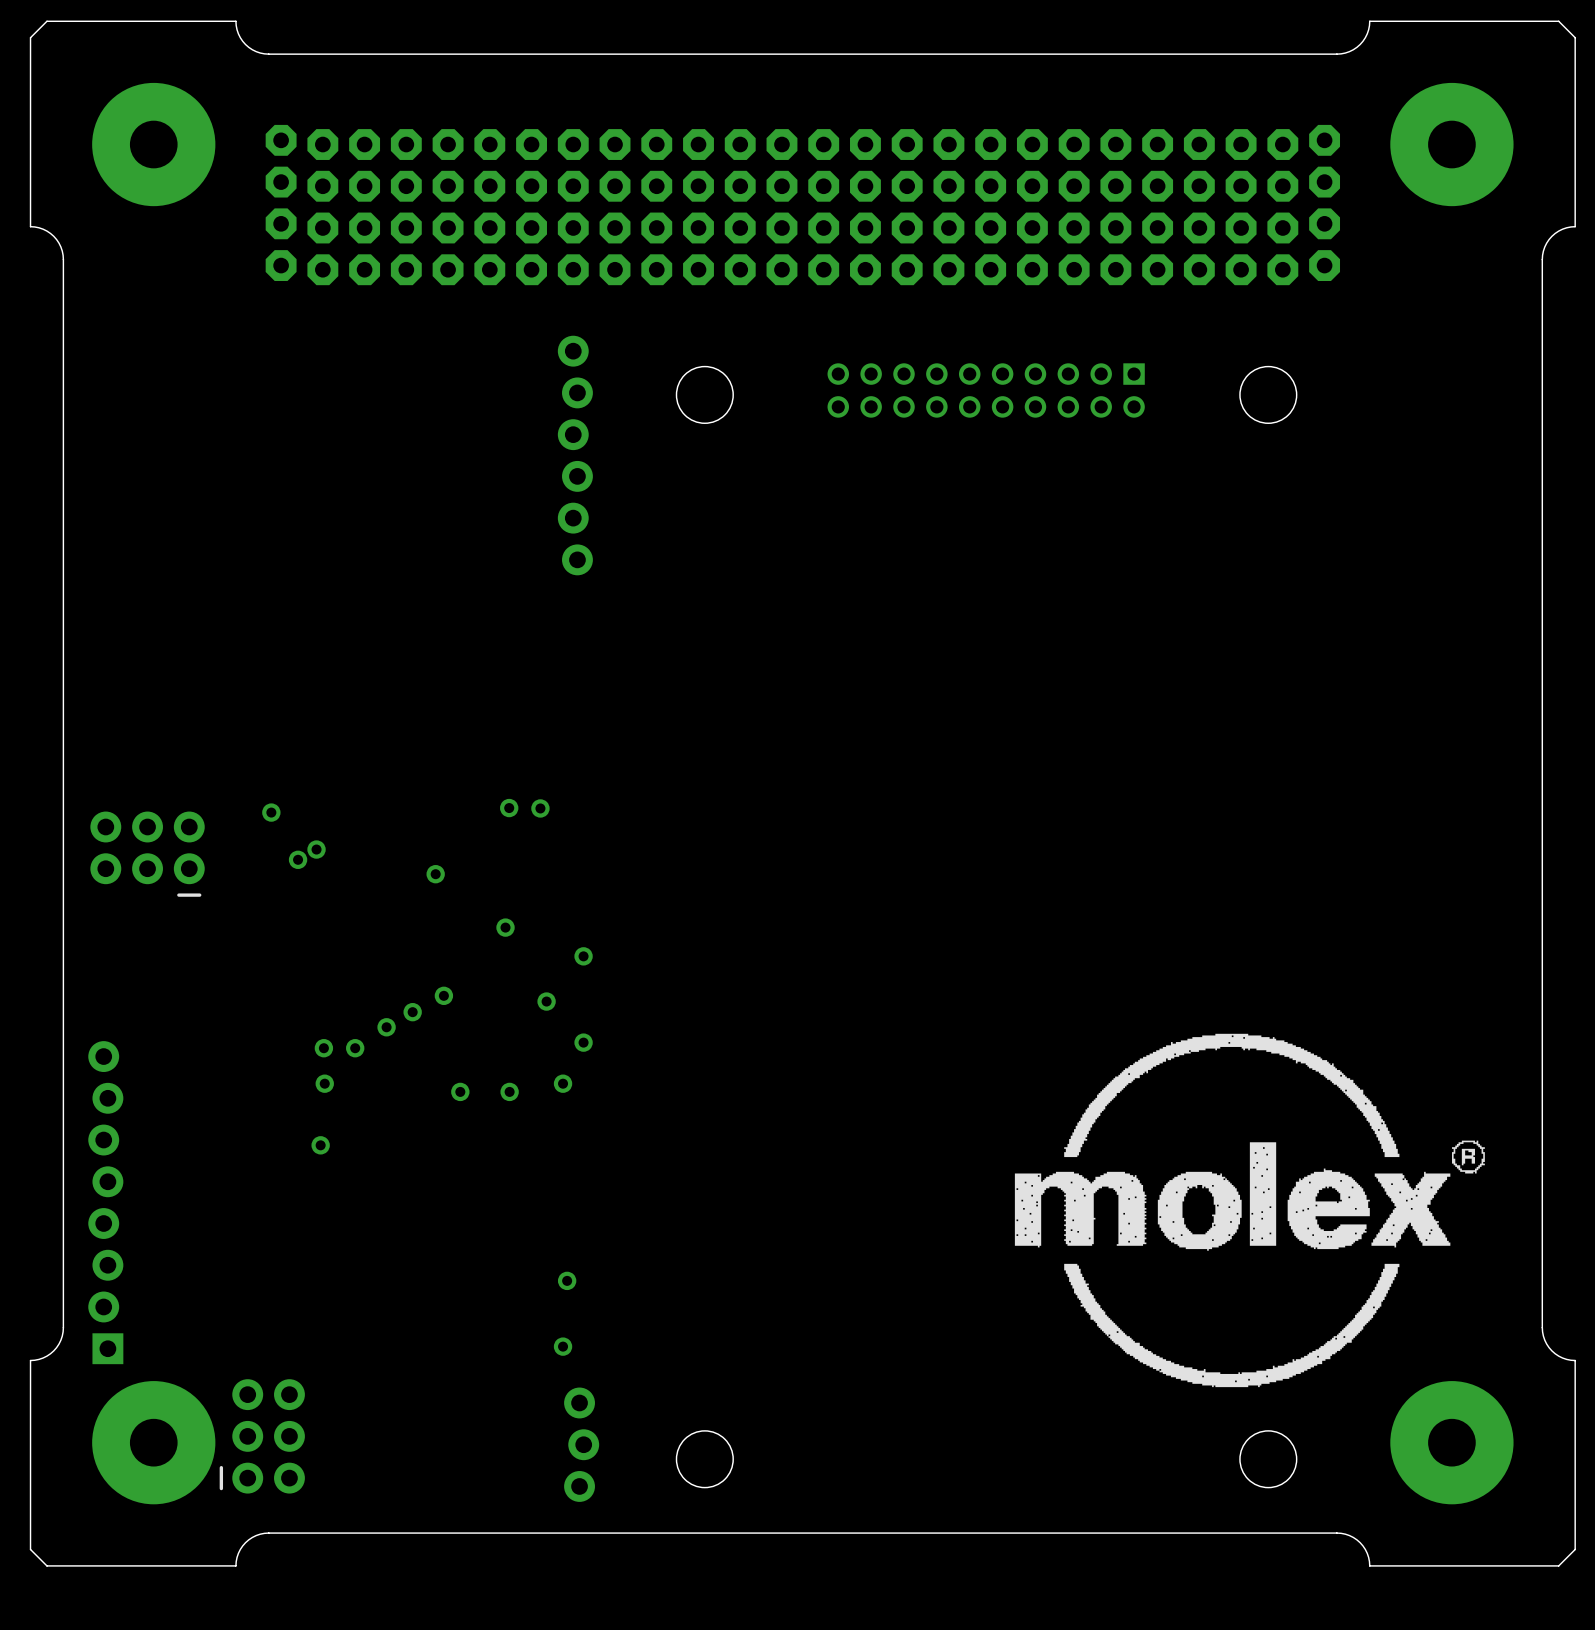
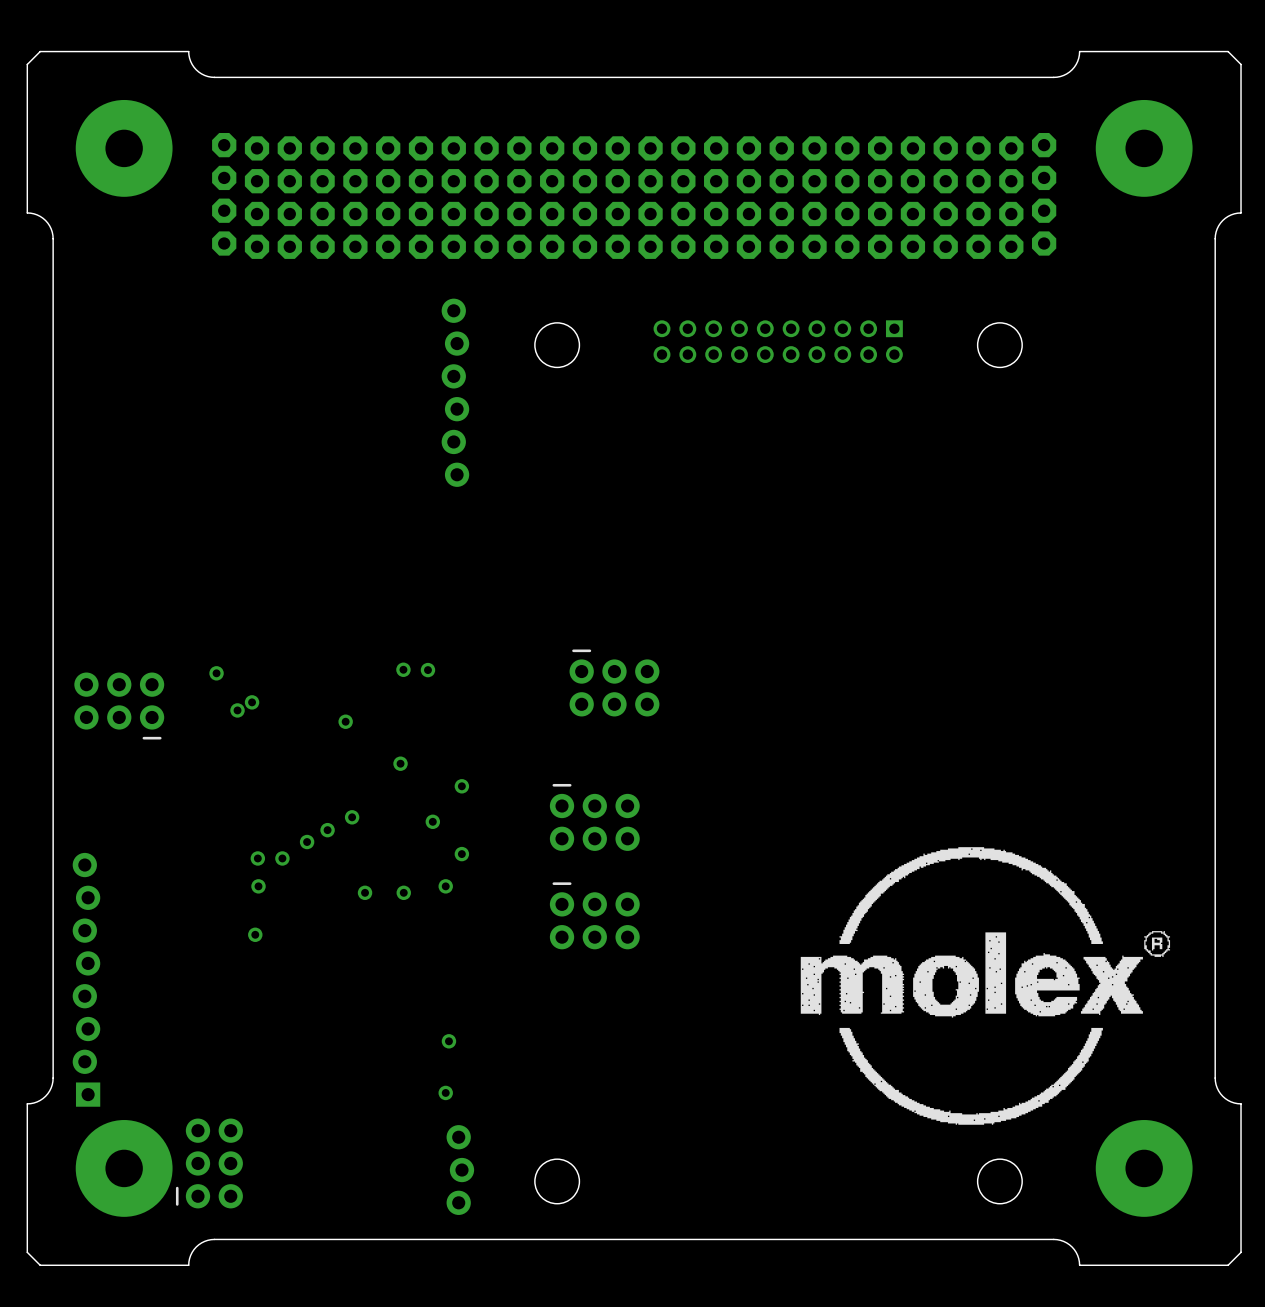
part: none -> (614, 682)
part: none -> (594, 817)
part: none -> (594, 915)

